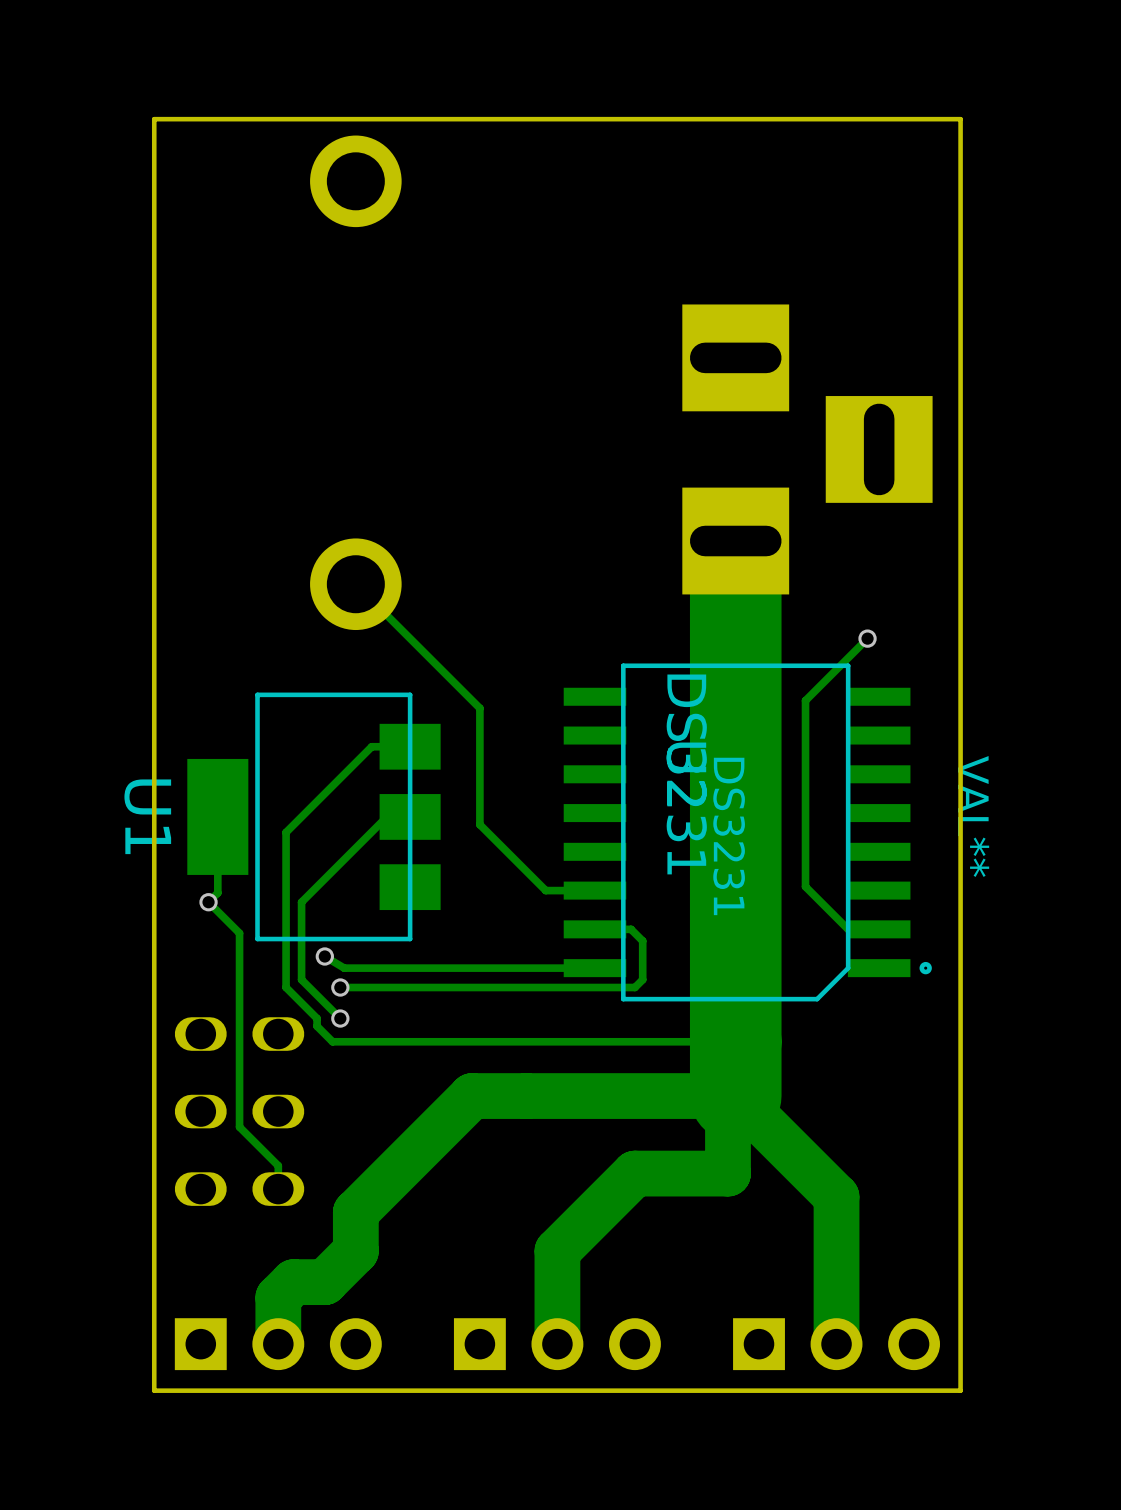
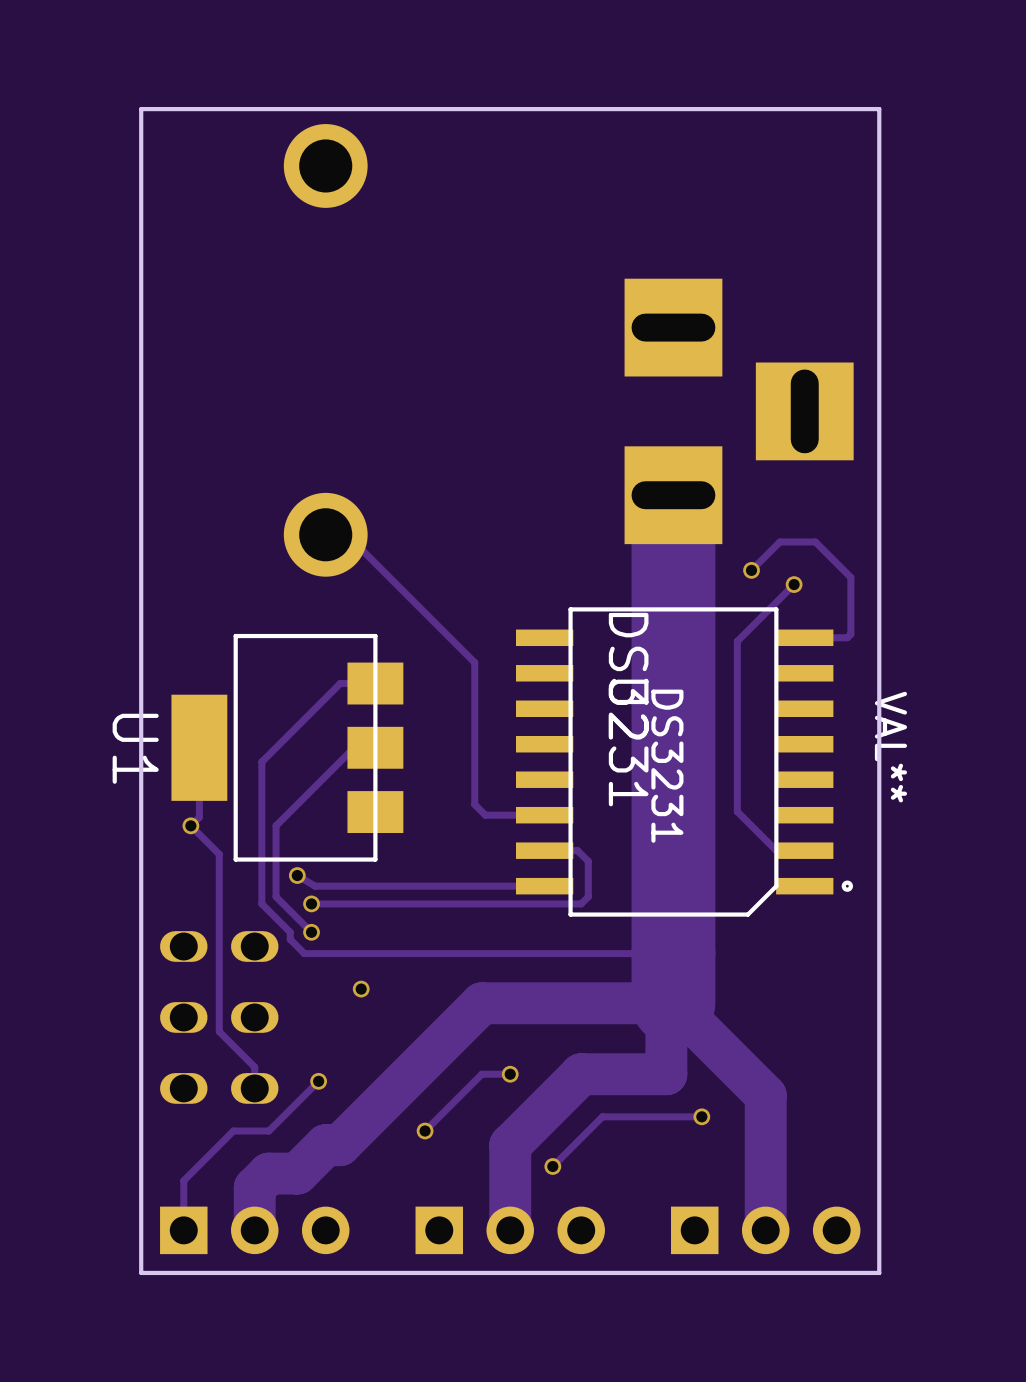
track: (355, 584) (479, 708) (479, 824) (545, 890) -> (325, 534) (346, 534) (474, 662) (474, 804) (485, 815) (499, 815)
track: none -> (751, 570) (779, 541) (815, 541) (850, 577) (850, 634) (847, 637) (804, 637)
via: none -> (751, 570)
via: none -> (361, 989)
track: (526, 1096) (472, 1096) (355, 1212) (355, 1251) -> (481, 1003) (339, 1145) (325, 1145)
track: none -> (510, 1074) (481, 1074) (425, 1131)
via: none -> (510, 1074)
track: none -> (318, 1081) (268, 1131) (233, 1131) (183, 1180) (183, 1230)
via: none -> (318, 1081)
track: none -> (701, 1116) (602, 1116) (552, 1166)
via: none -> (701, 1116)
via: none -> (425, 1131)
via: none -> (552, 1166)

